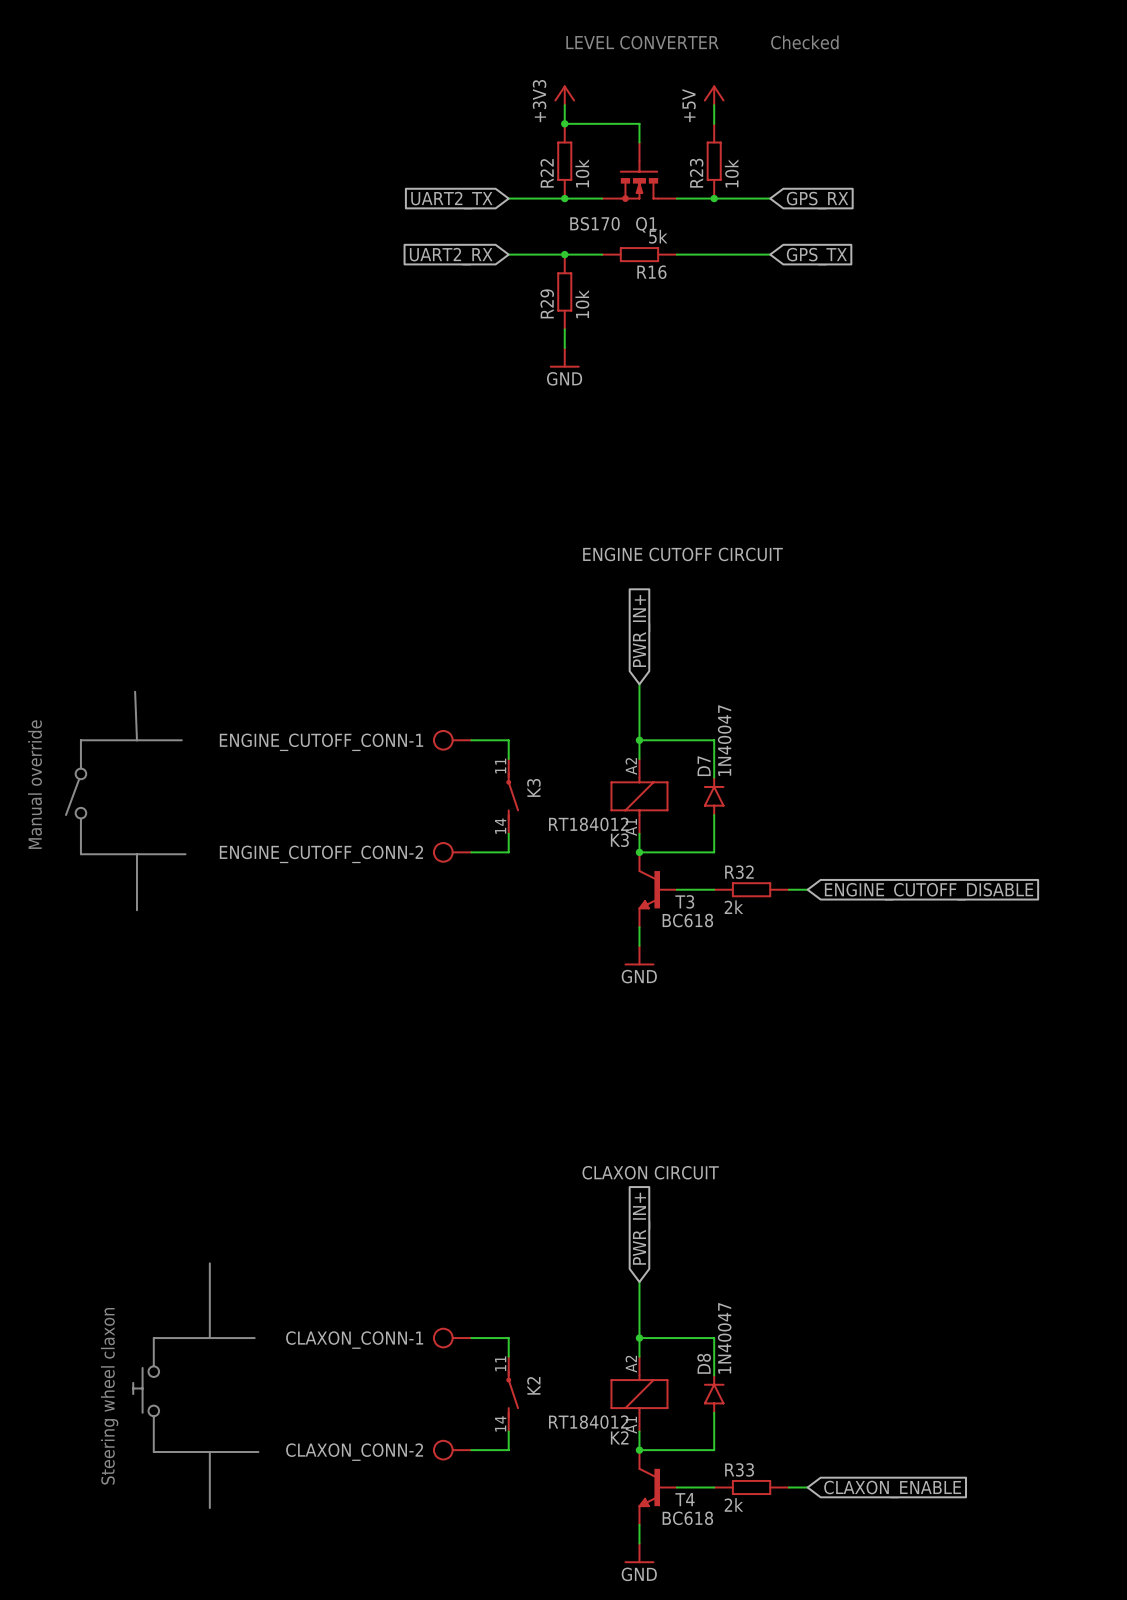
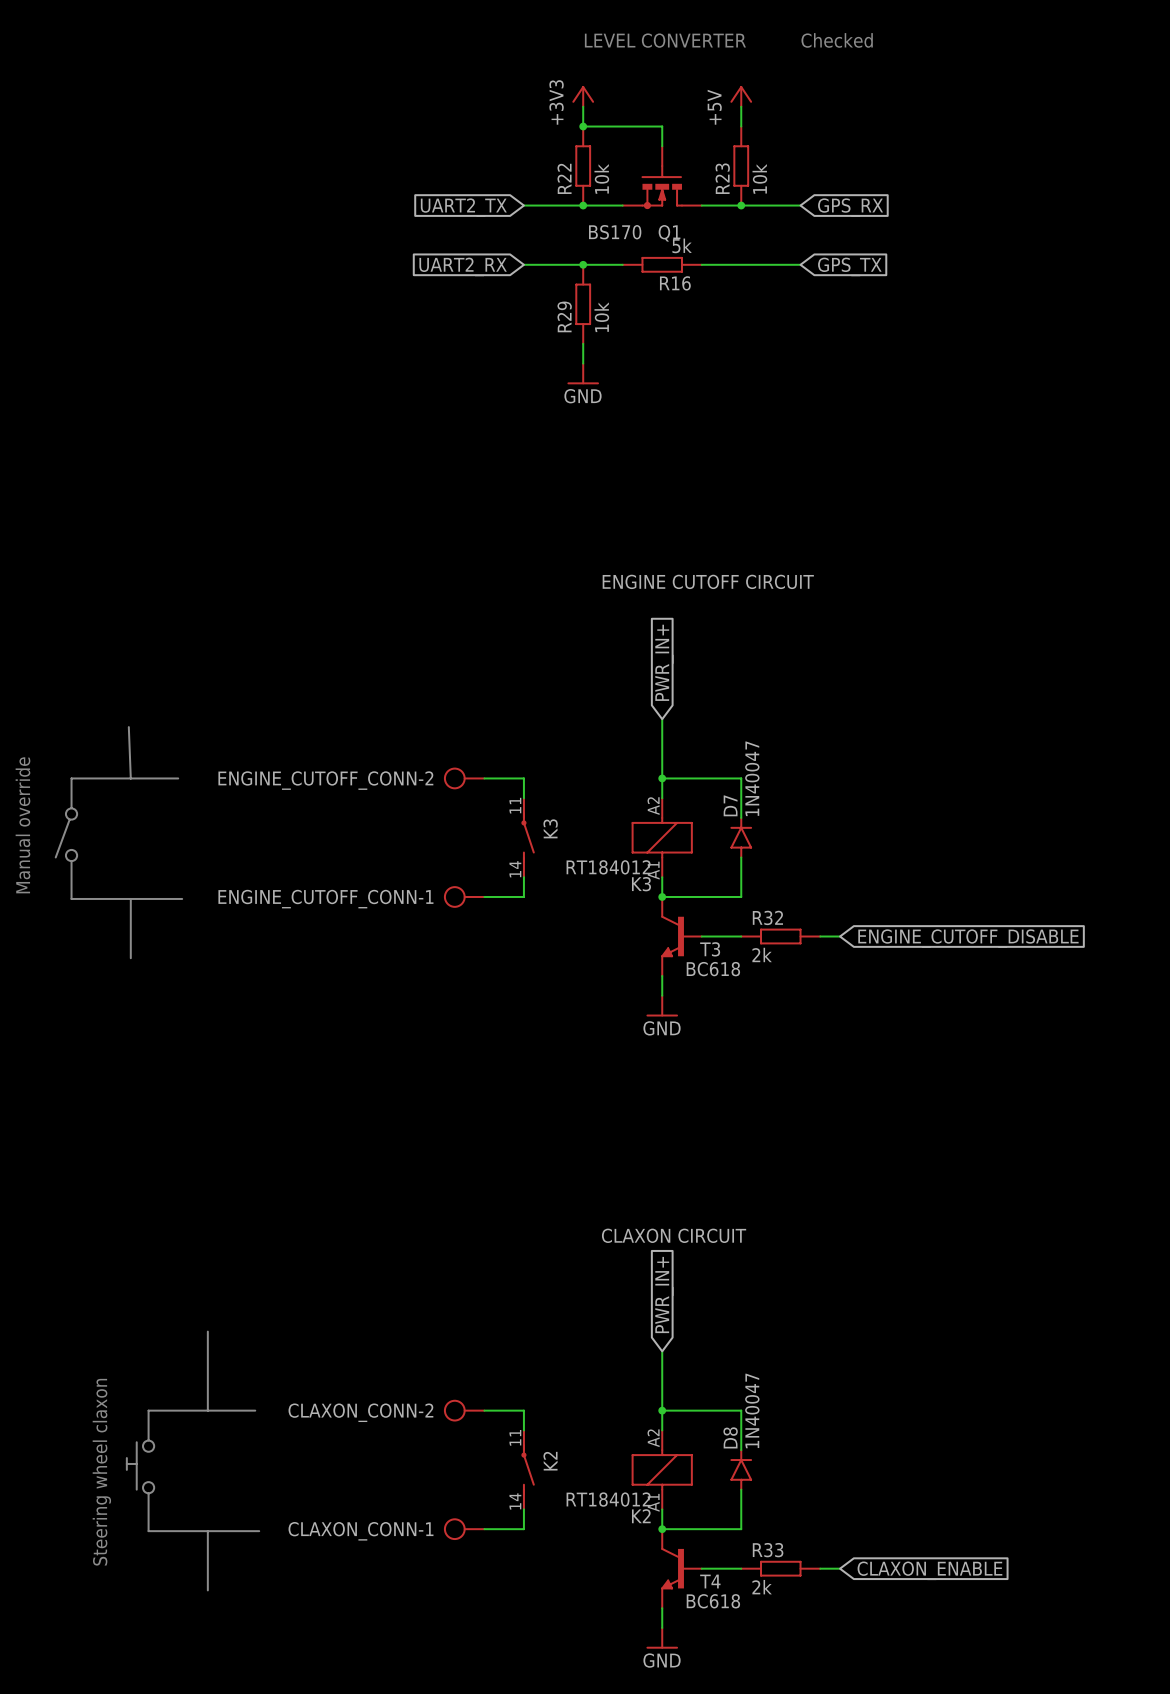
ENGINE_CUTOFF_CONN-1 name: ENGINE_CUTOFF_CONN-1 (321, 742) -> ENGINE_CUTOFF_CONN-2 (325, 780)
ENGINE_CUTOFF_CONN-2 name: ENGINE_CUTOFF_CONN-2 (321, 854) -> ENGINE_CUTOFF_CONN-1 (325, 899)
CLAXON_CONN-1 name: CLAXON_CONN-1 (354, 1340) -> CLAXON_CONN-2 (360, 1412)
CLAXON_CONN-2 name: CLAXON_CONN-2 (354, 1452) -> CLAXON_CONN-1 (361, 1531)

